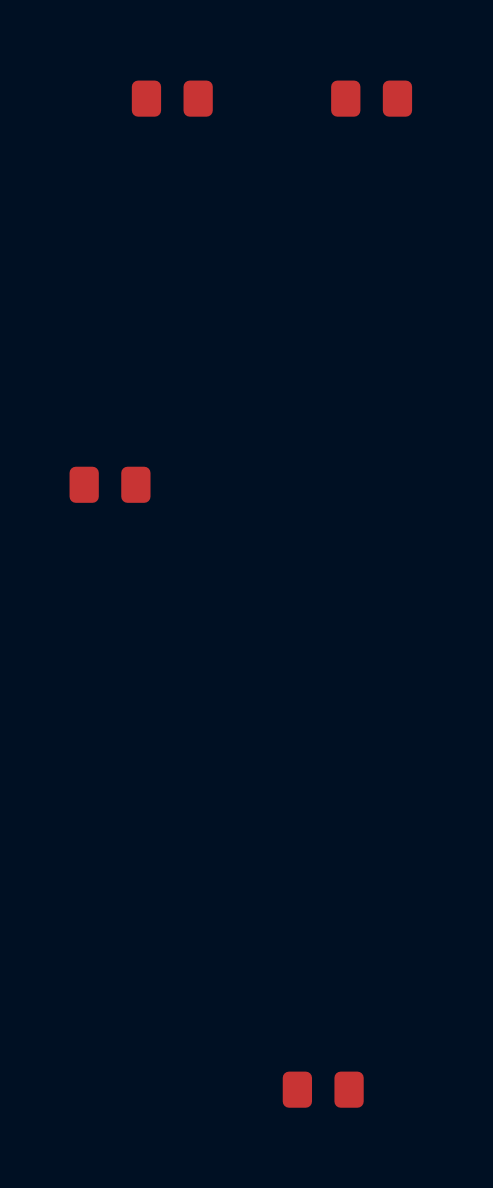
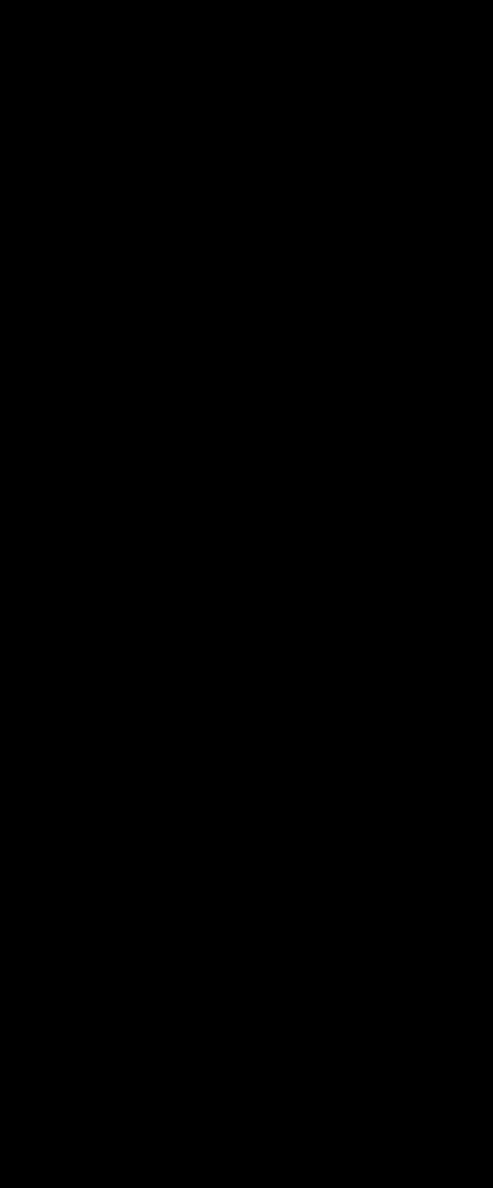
part: (172, 98) -> none
part: (371, 98) -> none
part: (110, 484) -> none
part: (323, 1089) -> none

